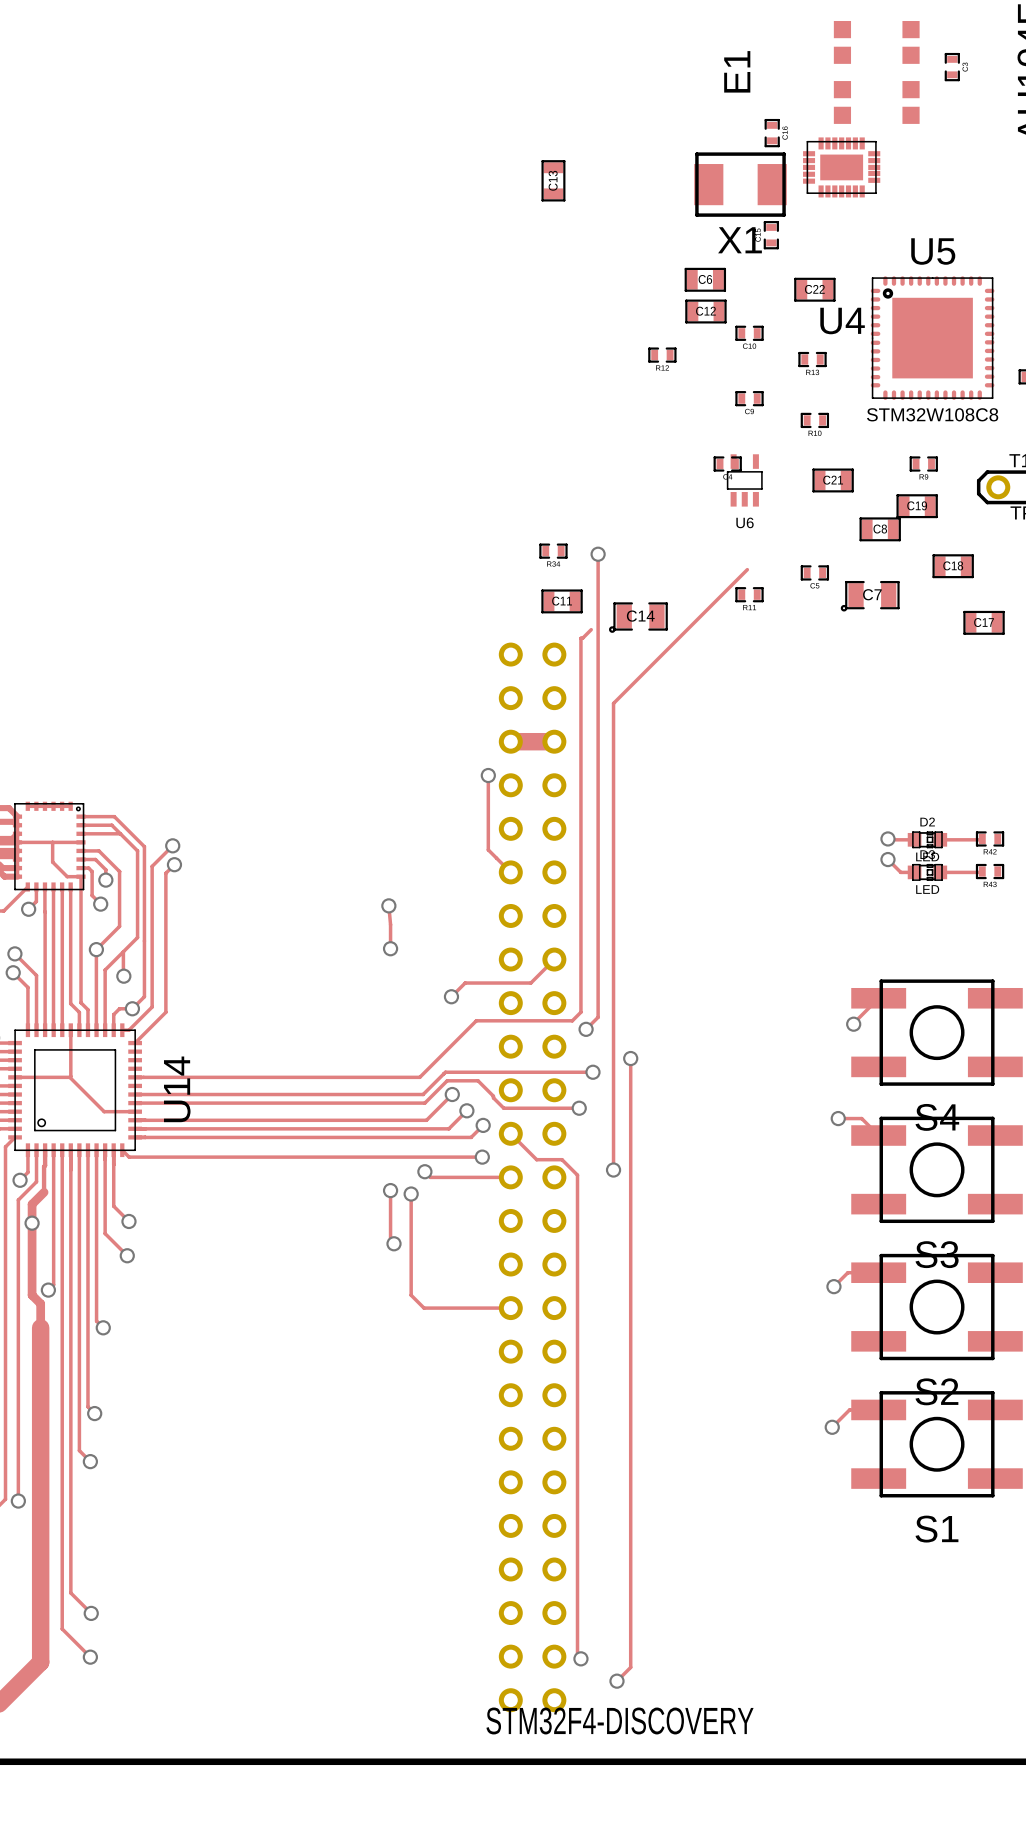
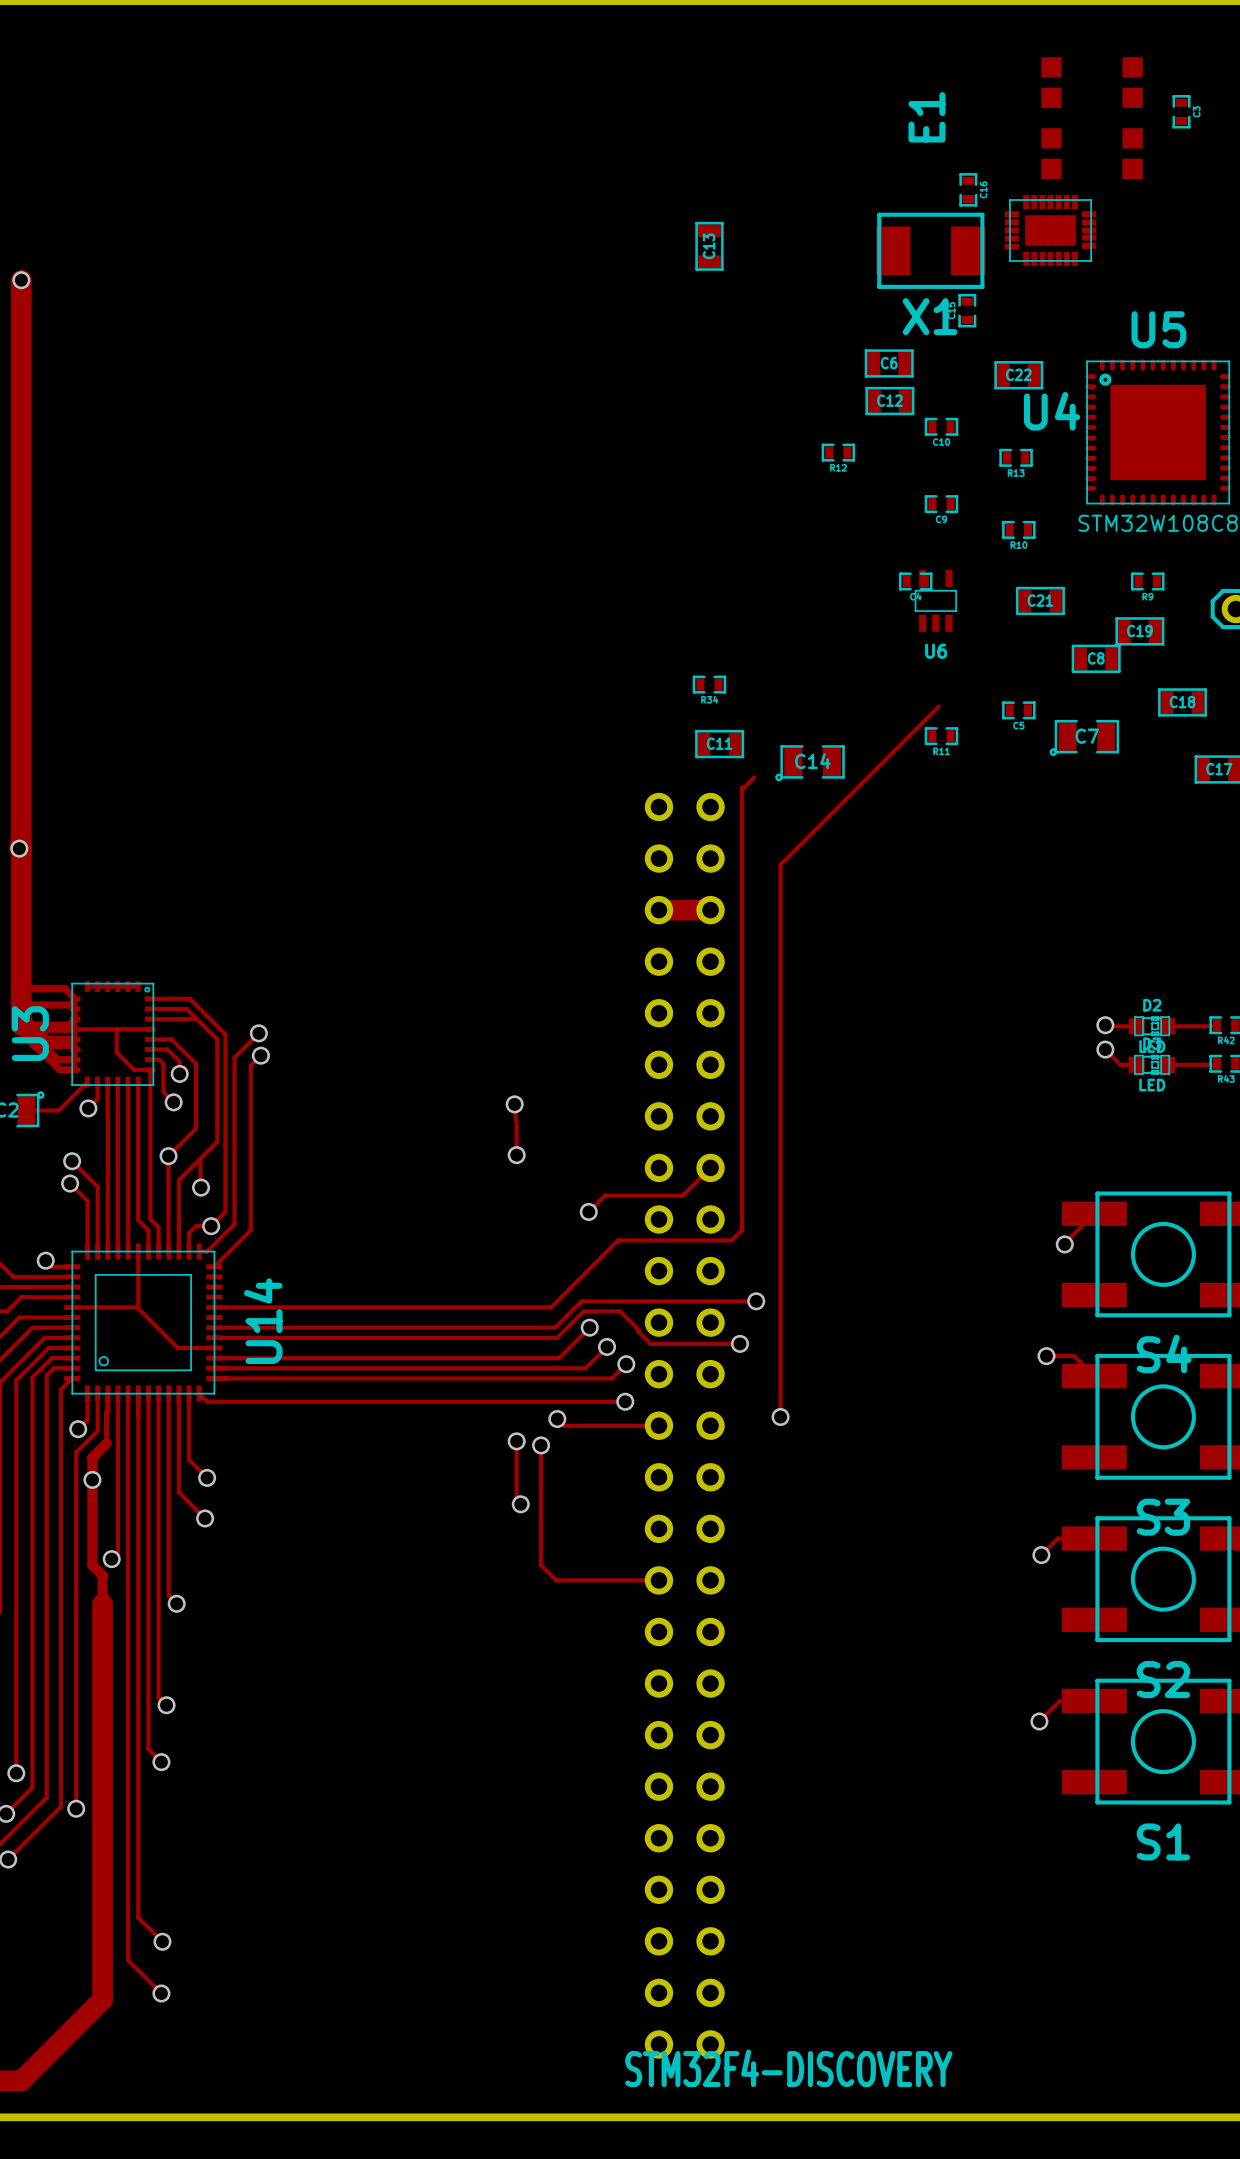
track: (598, 554) (598, 1017) (586, 1029) -> none
via: (598, 554) -> none
via: (488, 775) -> none
track: (488, 777) (488, 849) (510, 872) -> none
via: (586, 1029) -> none
track: (630, 1058) (630, 1667) (616, 1681) -> none
via: (630, 1058) -> none
track: (510, 1133) (536, 1159) (562, 1159) (577, 1175) (577, 1655) (580, 1658) -> none
via: (580, 1658) -> none
via: (616, 1681) -> none

